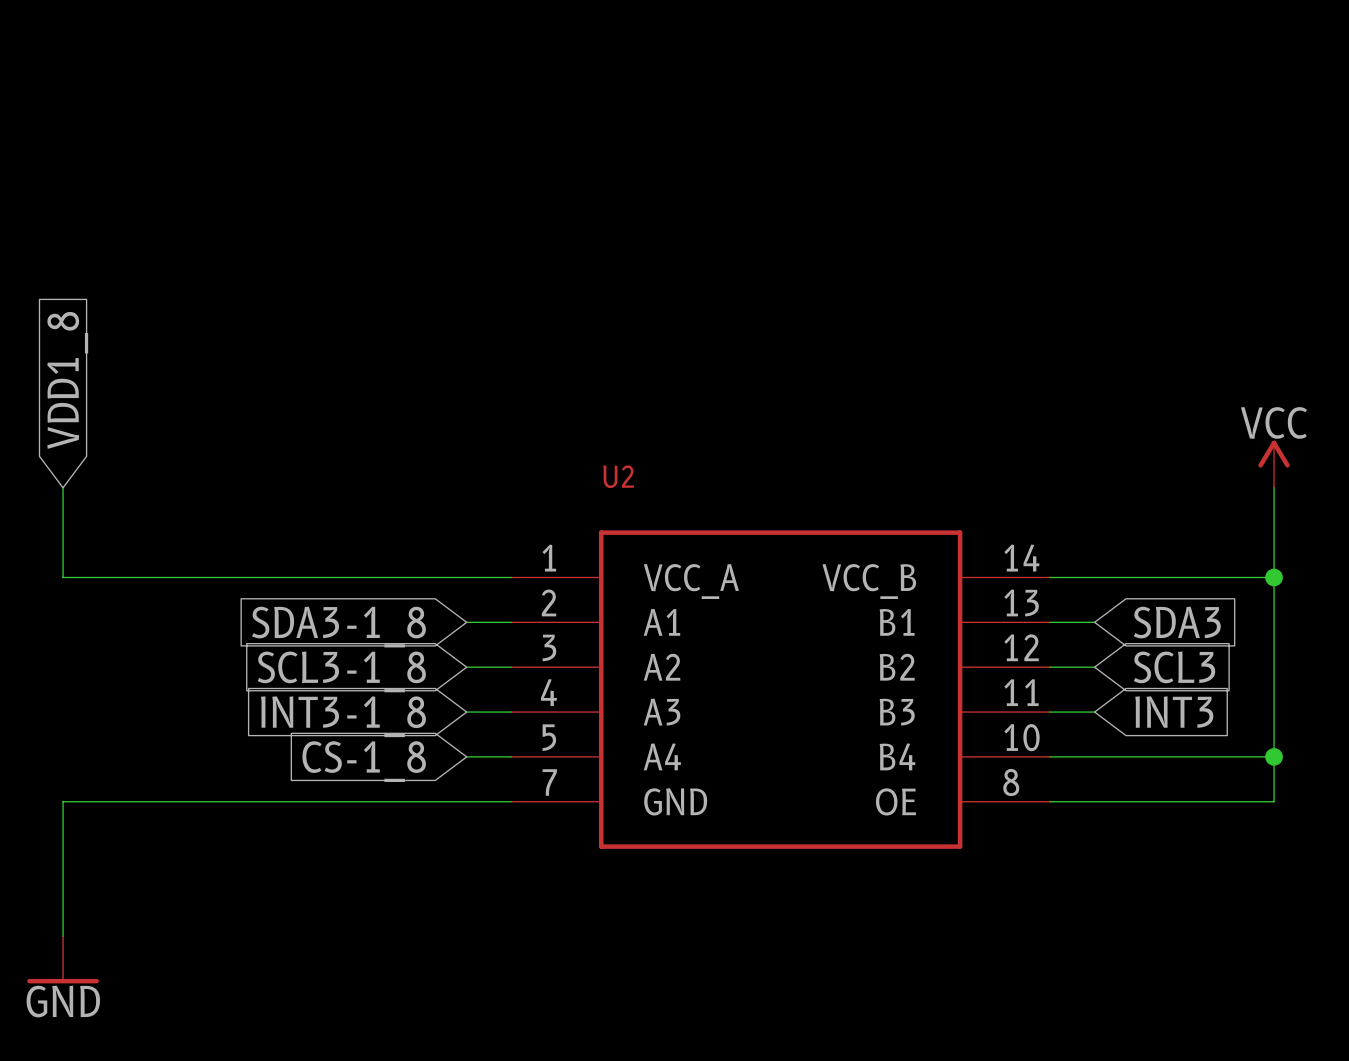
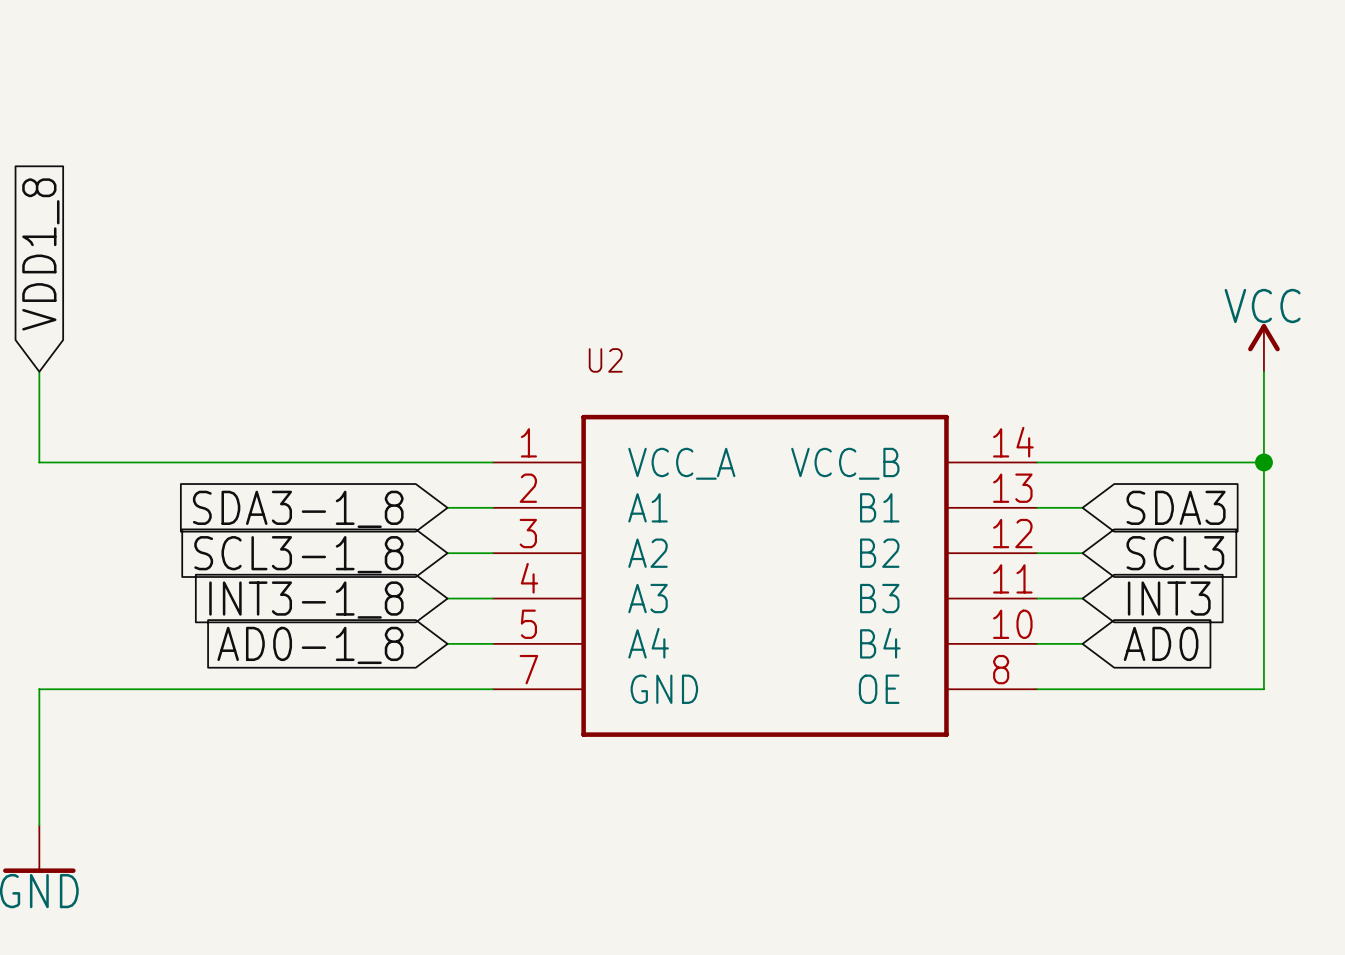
wire: (1094, 756) (1274, 756) -> none
junction: (1274, 756) -> none
global label: none -> AD0 (1161, 643)
global label: CS-1_8 (364, 761) -> AD0-1_8 (310, 645)

